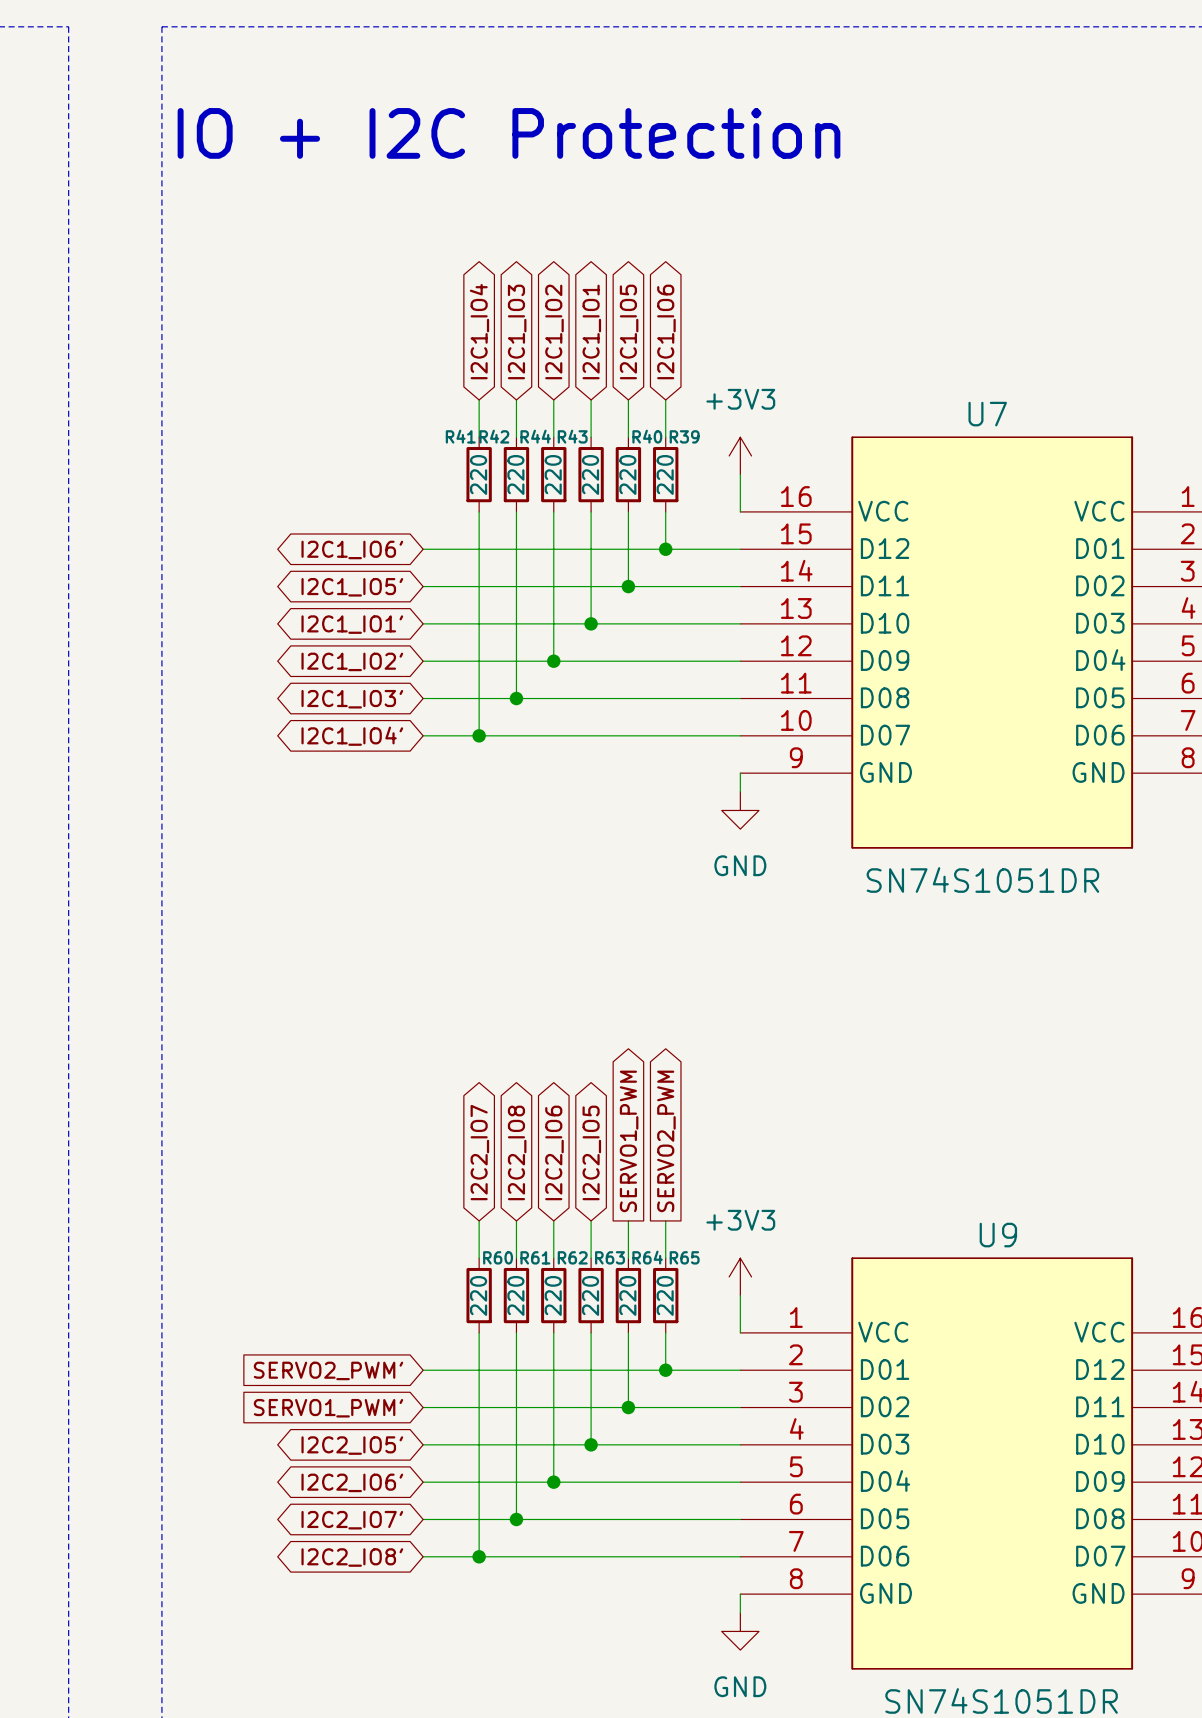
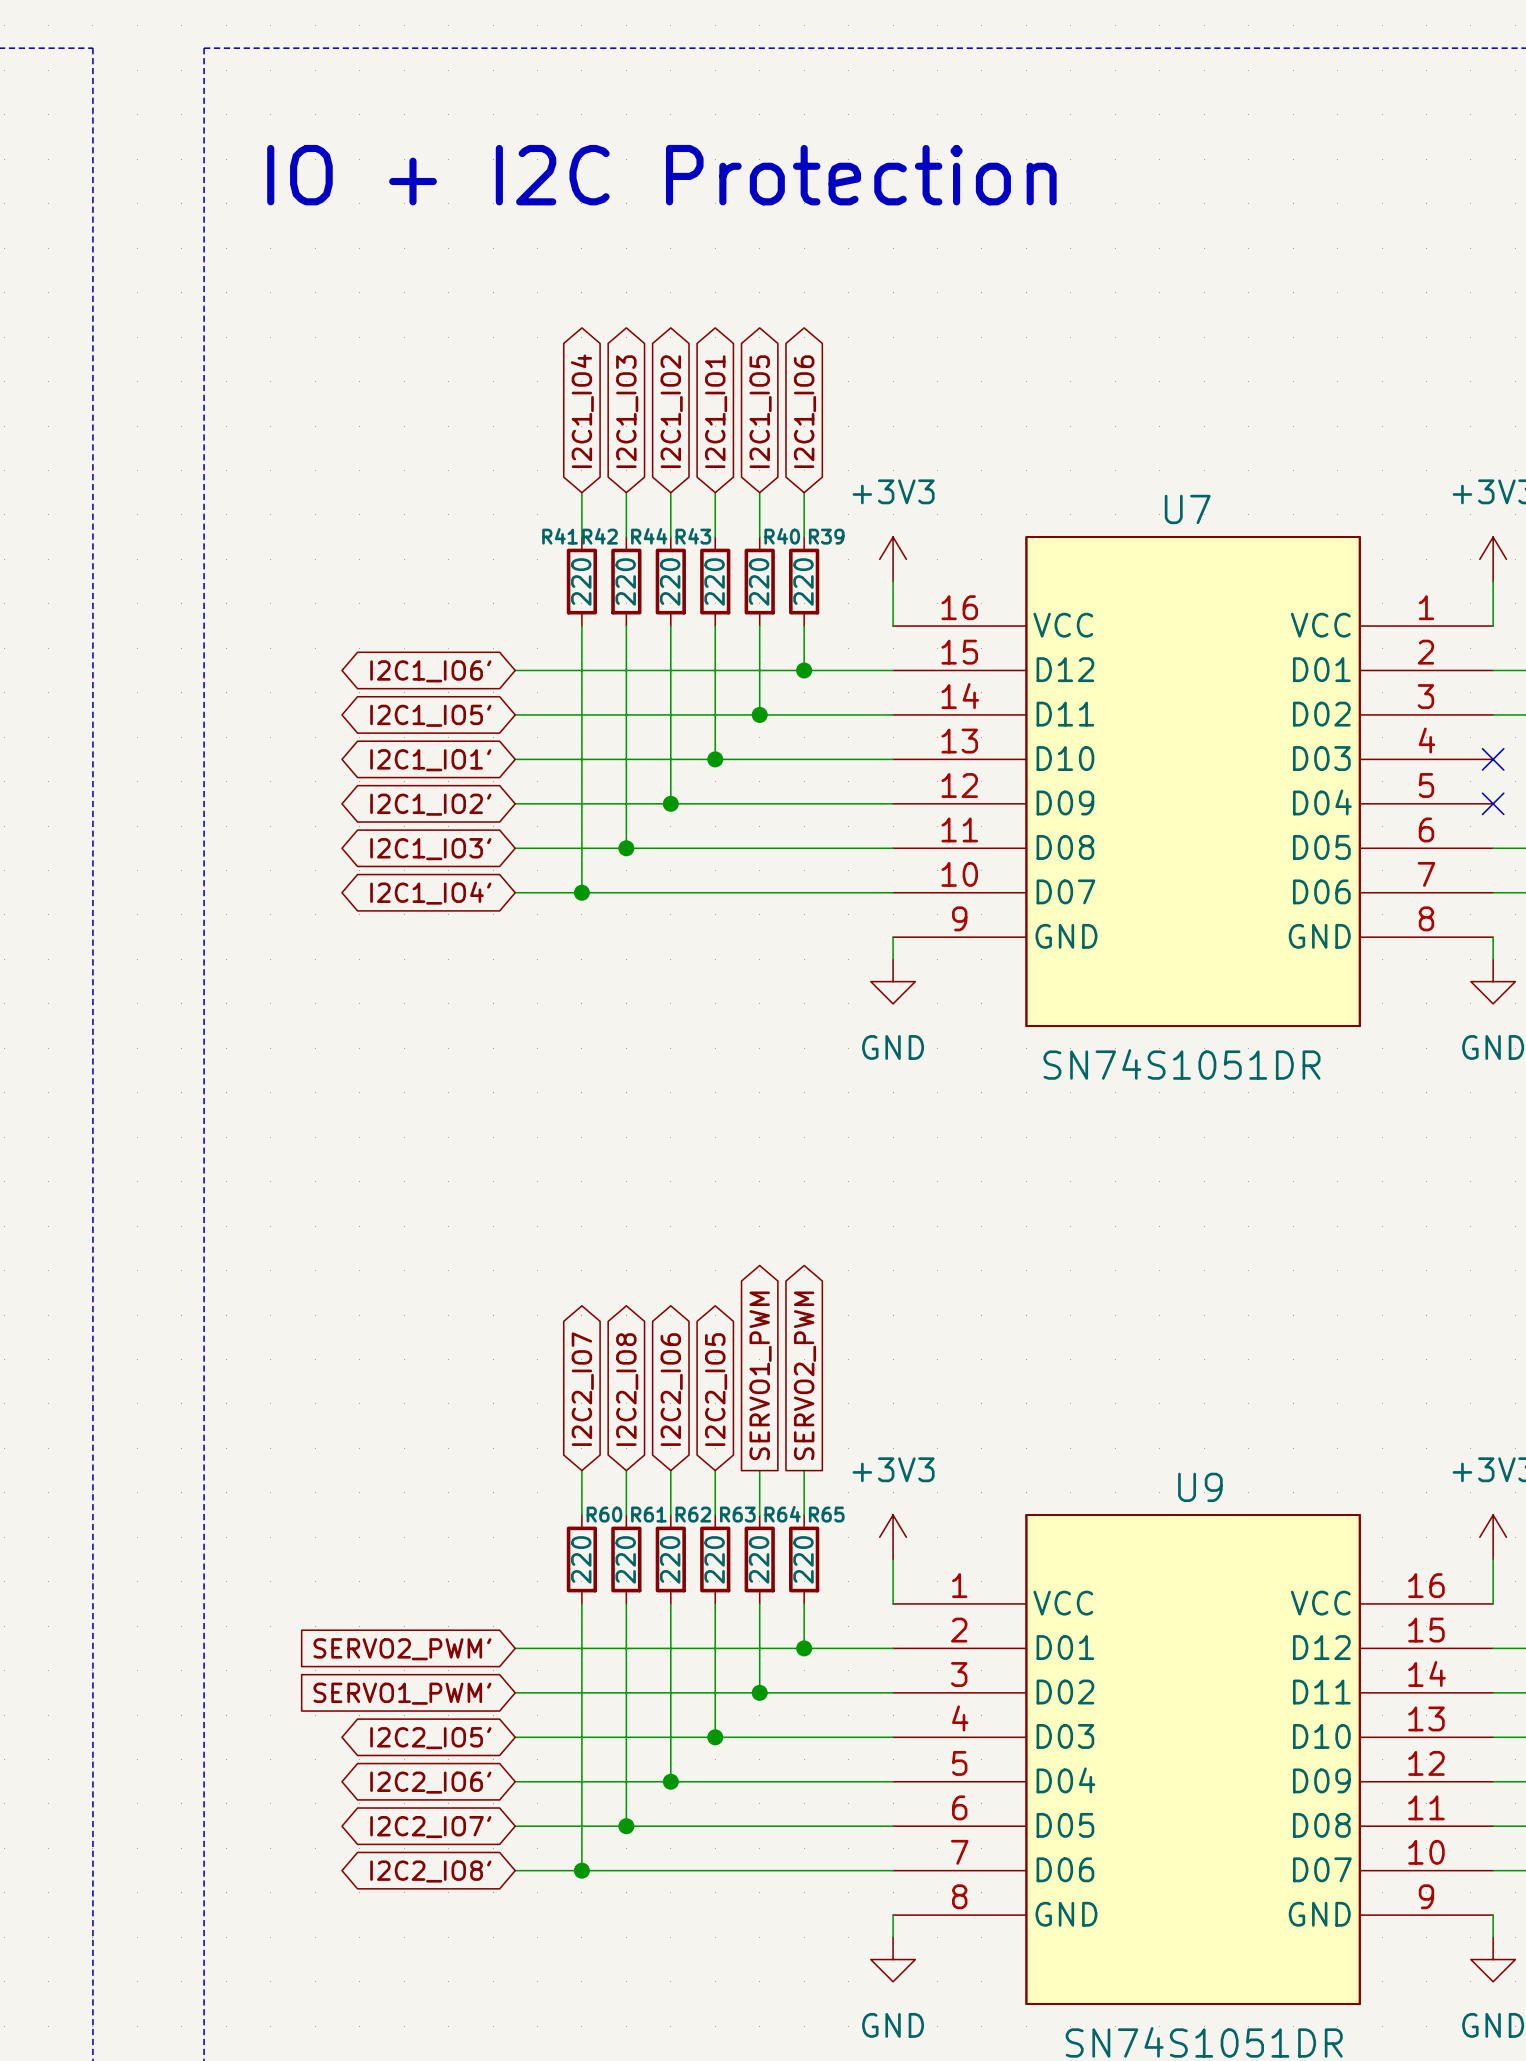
text position: IO + I2C Protection (508, 133) -> IO + I2C Protection (661, 175)

